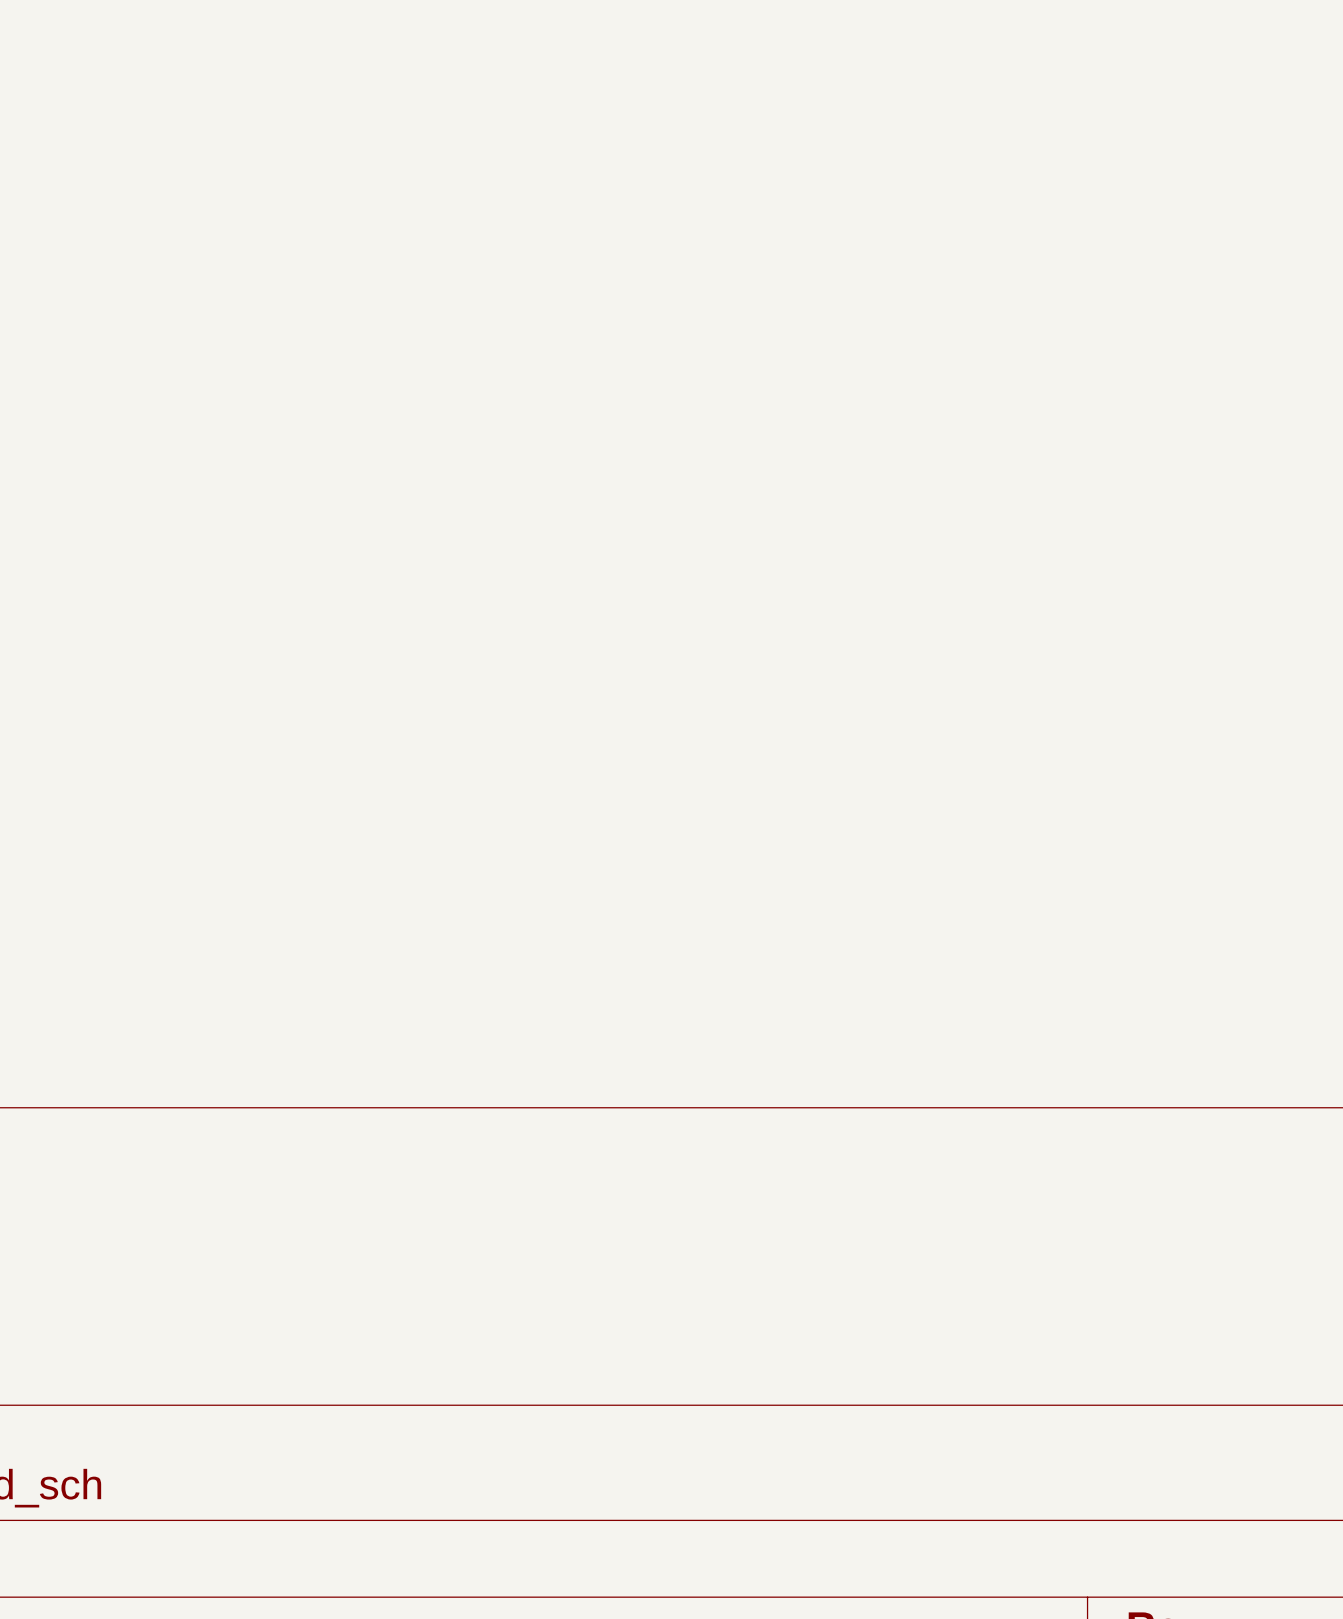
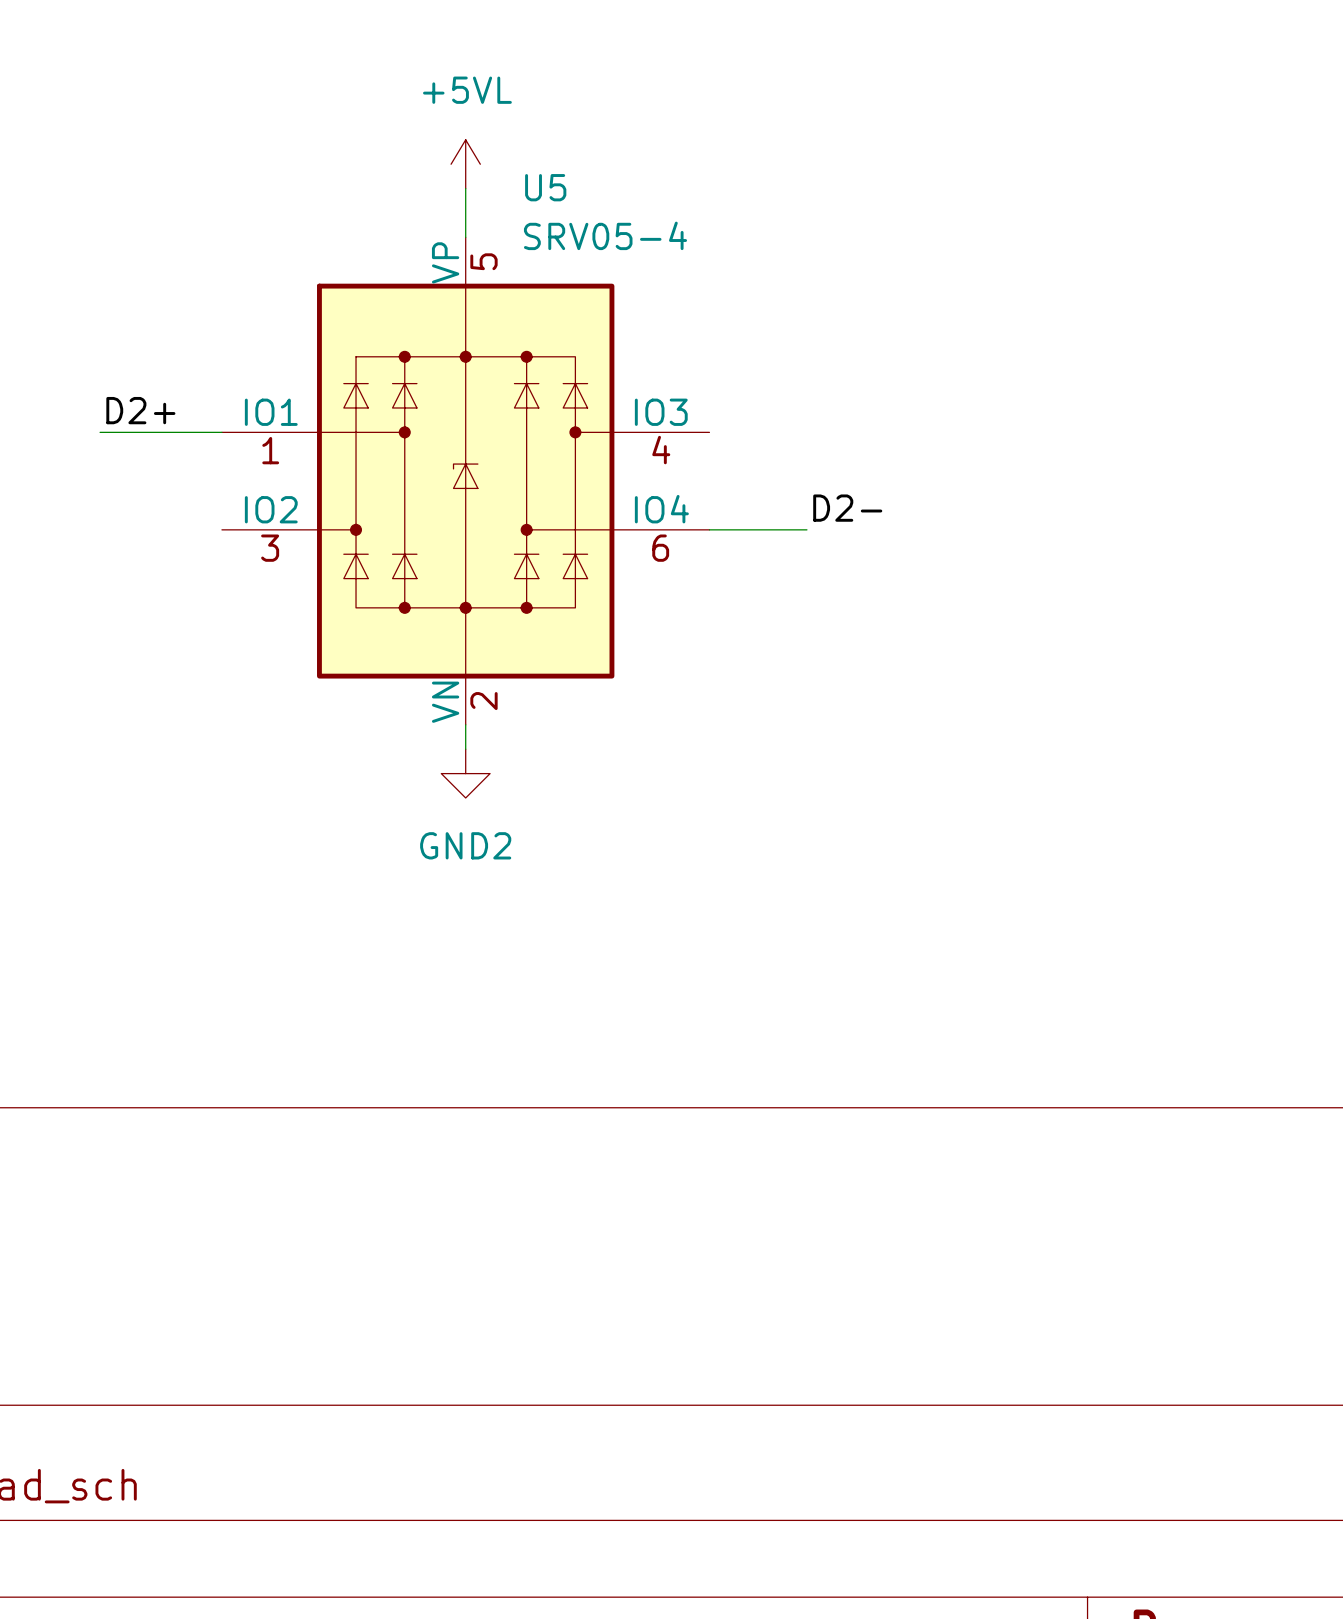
power symbol: none -> +5VL (465, 164)
wire: none -> (465, 188) (465, 237)
label: none -> D2+ (140, 410)
wire: none -> (100, 432) (221, 432)
U5: none -> SRV05-4 (465, 481)
label: none -> D2- (847, 508)
wire: none -> (709, 529) (806, 529)
wire: none -> (465, 724) (465, 749)
power symbol: none -> GND2 (465, 773)

